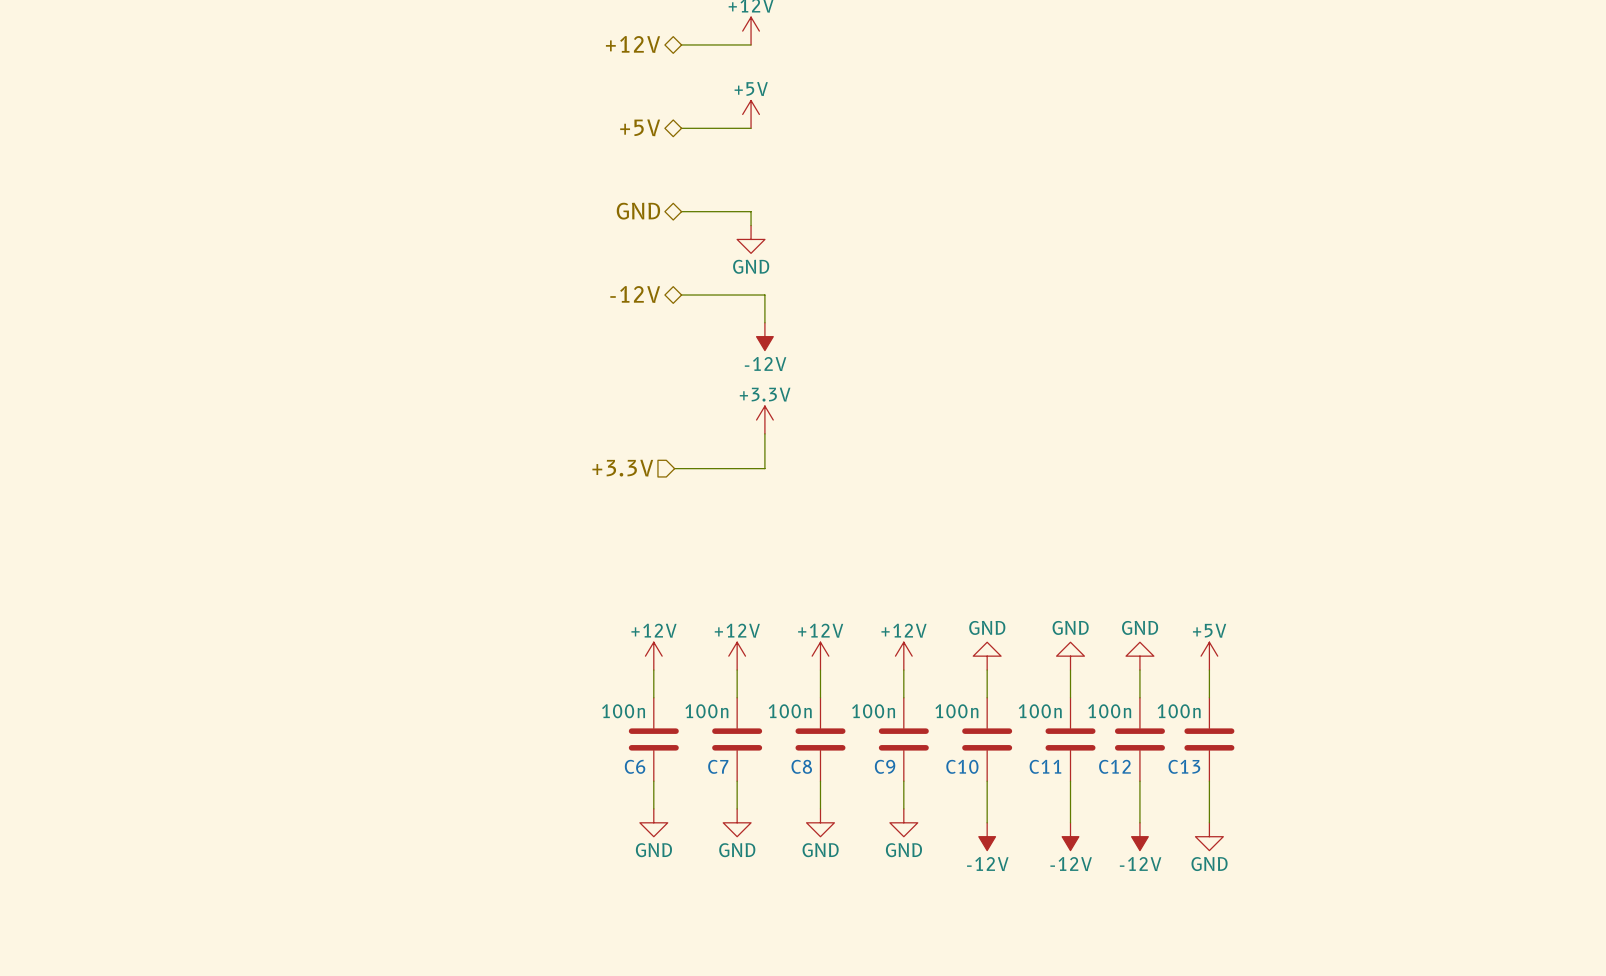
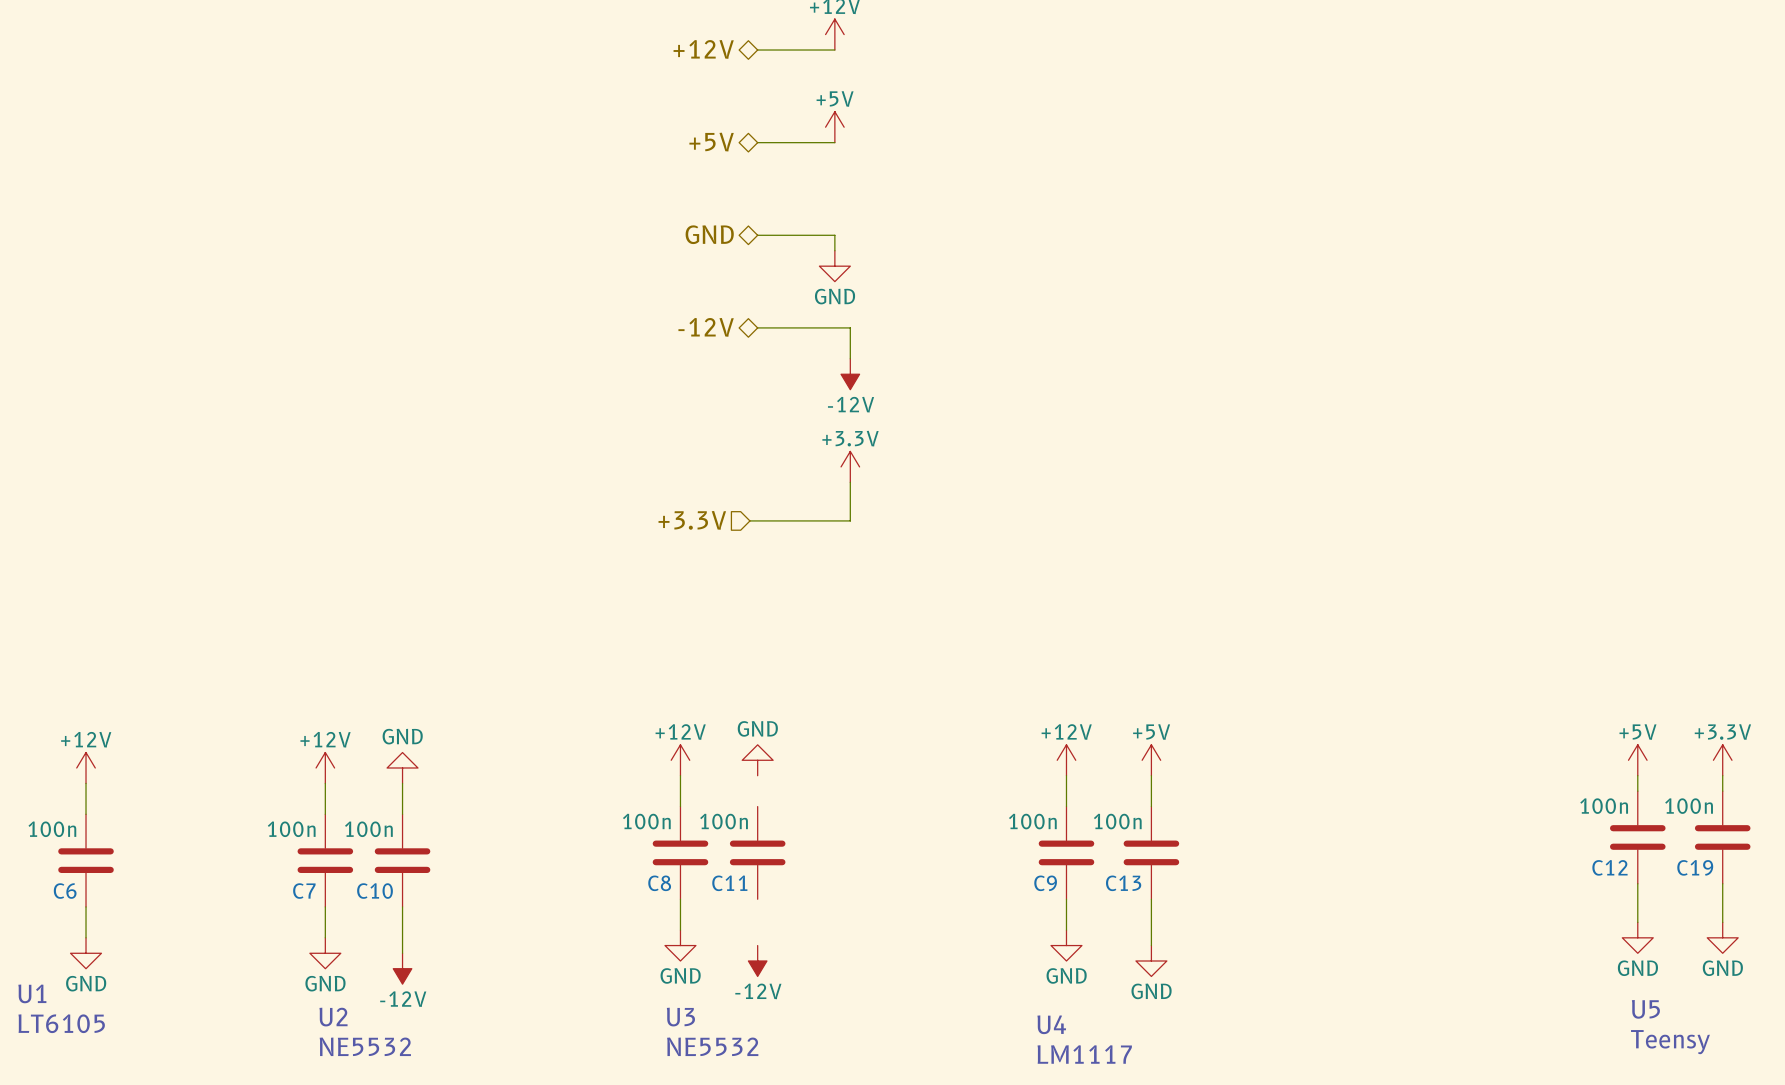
power symbol position: +12V (653, 656) -> +12V (680, 760)
power symbol: +12V (737, 656) -> none
power symbol: +12V (820, 656) -> none
power symbol position: +12V (903, 656) -> +12V (1066, 760)
power symbol: GND (987, 656) -> none
power symbol: GND (1070, 656) -> none
power symbol: GND (1139, 656) -> none
power symbol: +5V (1209, 656) -> none
wire: (653, 670) (653, 697) -> (680, 775) (680, 806)
wire: (737, 670) (737, 697) -> none
wire: (820, 670) (820, 697) -> none
wire: (903, 670) (903, 697) -> (1066, 775) (1066, 806)
wire: (987, 670) (987, 697) -> none
wire: (1070, 670) (1070, 697) -> (1151, 775) (1151, 806)
wire: (1139, 670) (1139, 697) -> none
wire: (1209, 670) (1209, 697) -> none
power symbol: none -> GND (757, 760)
power symbol: none -> +5V (1151, 760)
power symbol: none -> +5V (1637, 760)
power symbol: none -> +3.3V (1722, 760)
power symbol: none -> +12V (86, 767)
power symbol: none -> +12V (325, 767)
power symbol: none -> GND (402, 767)
wire: none -> (1637, 775) (1637, 791)
wire: none -> (1722, 775) (1722, 791)
wire: none -> (86, 783) (86, 814)
wire: none -> (325, 783) (325, 814)
wire: none -> (402, 783) (402, 814)
C6 position: (653, 739) -> (86, 860)
C7 position: (737, 739) -> (325, 860)
C8 position: (820, 739) -> (680, 852)
C9 position: (903, 739) -> (1066, 852)
C10 position: (987, 739) -> (402, 860)
C11 position: (1070, 739) -> (757, 852)
C12 position: (1139, 739) -> (1637, 837)
C13 position: (1209, 739) -> (1151, 852)
C19: none -> 100n (1722, 837)
wire: (653, 781) (653, 808) -> (680, 899) (680, 930)
wire: (737, 781) (737, 808) -> none
wire: (820, 781) (820, 808) -> none
wire: (903, 781) (903, 808) -> (1066, 899) (1066, 930)
wire: (987, 781) (987, 822) -> none
wire: (1070, 781) (1070, 822) -> (1151, 899) (1151, 945)
wire: (1139, 781) (1139, 822) -> none
wire: (1209, 781) (1209, 822) -> none
wire: none -> (1637, 883) (1637, 922)
wire: none -> (1722, 883) (1722, 922)
wire: none -> (86, 906) (86, 937)
wire: none -> (325, 906) (325, 937)
wire: none -> (402, 906) (402, 953)
power symbol position: GND (653, 822) -> GND (680, 945)
power symbol: GND (737, 822) -> none
power symbol: GND (820, 822) -> none
power symbol position: GND (903, 822) -> GND (1066, 945)
power symbol: -12V (987, 836) -> none
power symbol: -12V (1070, 836) -> none
power symbol: -12V (1139, 836) -> none
power symbol: GND (1209, 836) -> none
power symbol: none -> GND (1637, 937)
power symbol: none -> GND (1722, 937)
power symbol: none -> GND (86, 953)
power symbol: none -> GND (325, 953)
power symbol: none -> -12V (757, 961)
power symbol: none -> GND (1151, 961)
power symbol: none -> -12V (402, 968)
text: none -> U1 (32, 993)
text: none -> U5 (1645, 1009)
text: none -> U2 (333, 1017)
text: none -> U3 (680, 1017)
text: none -> LT6105 (61, 1023)
text: none -> U4 (1051, 1024)
text: none -> Teensy (1670, 1042)
text: none -> NE5532 (365, 1046)
text: none -> NE5532 (712, 1046)
text: none -> LM1117 (1084, 1054)

